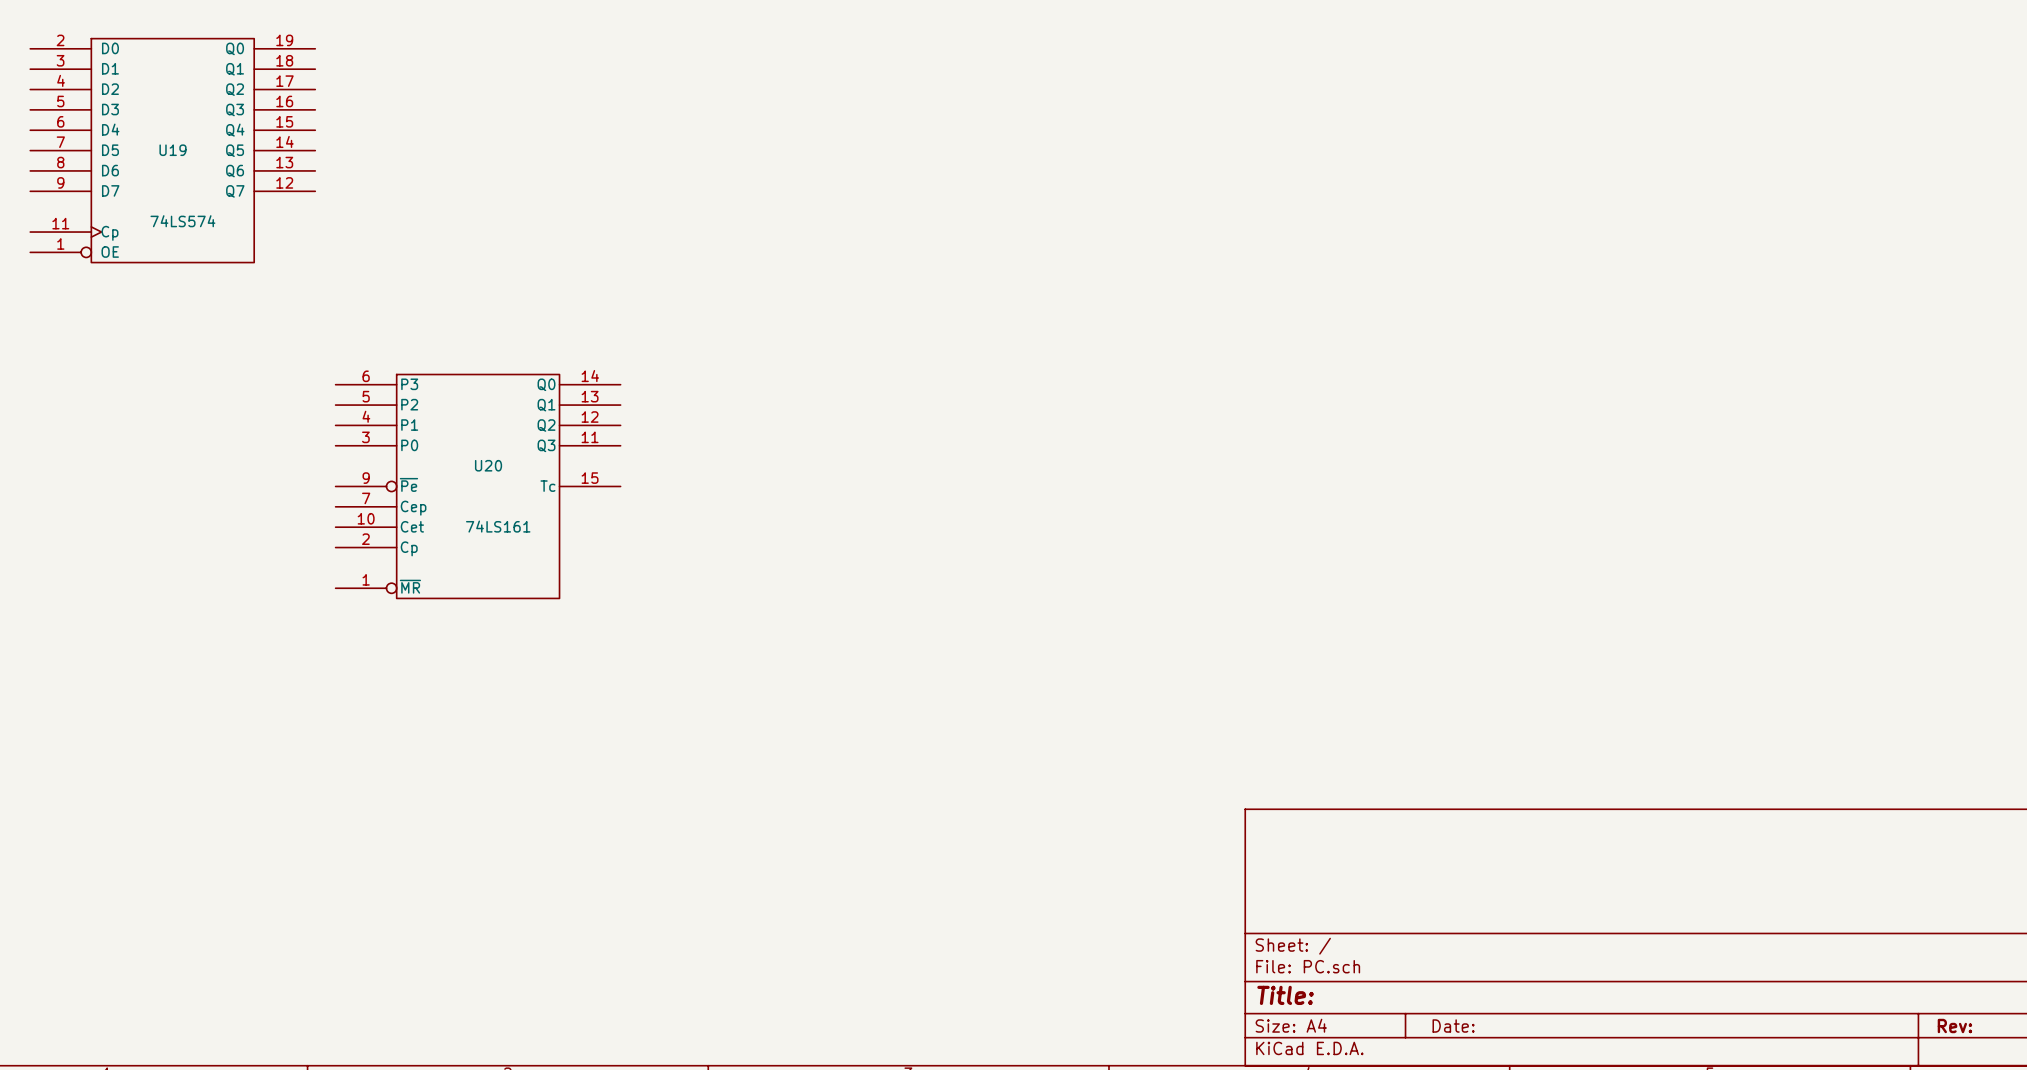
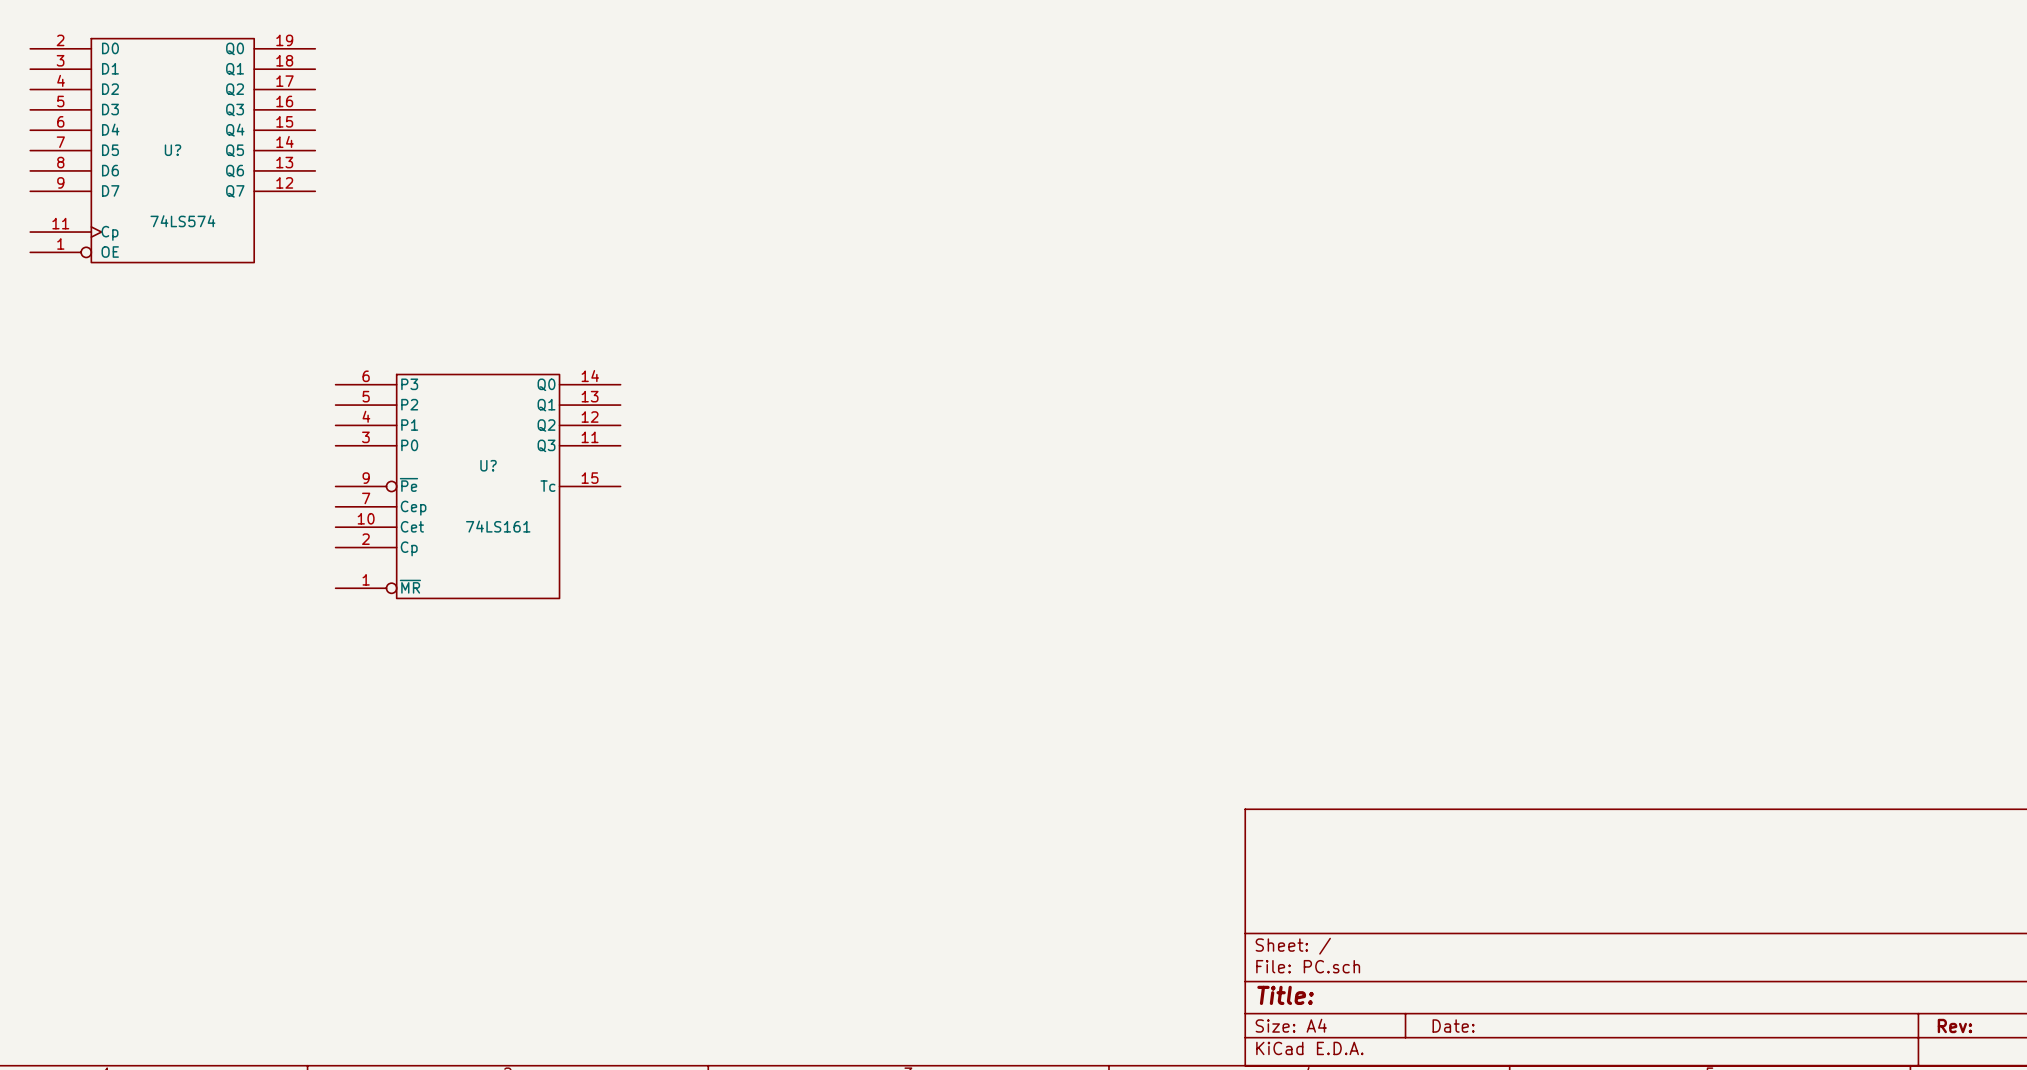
U19 name: U19 (173, 150) -> U? (173, 150)
U20 name: U20 (488, 465) -> U? (488, 465)

